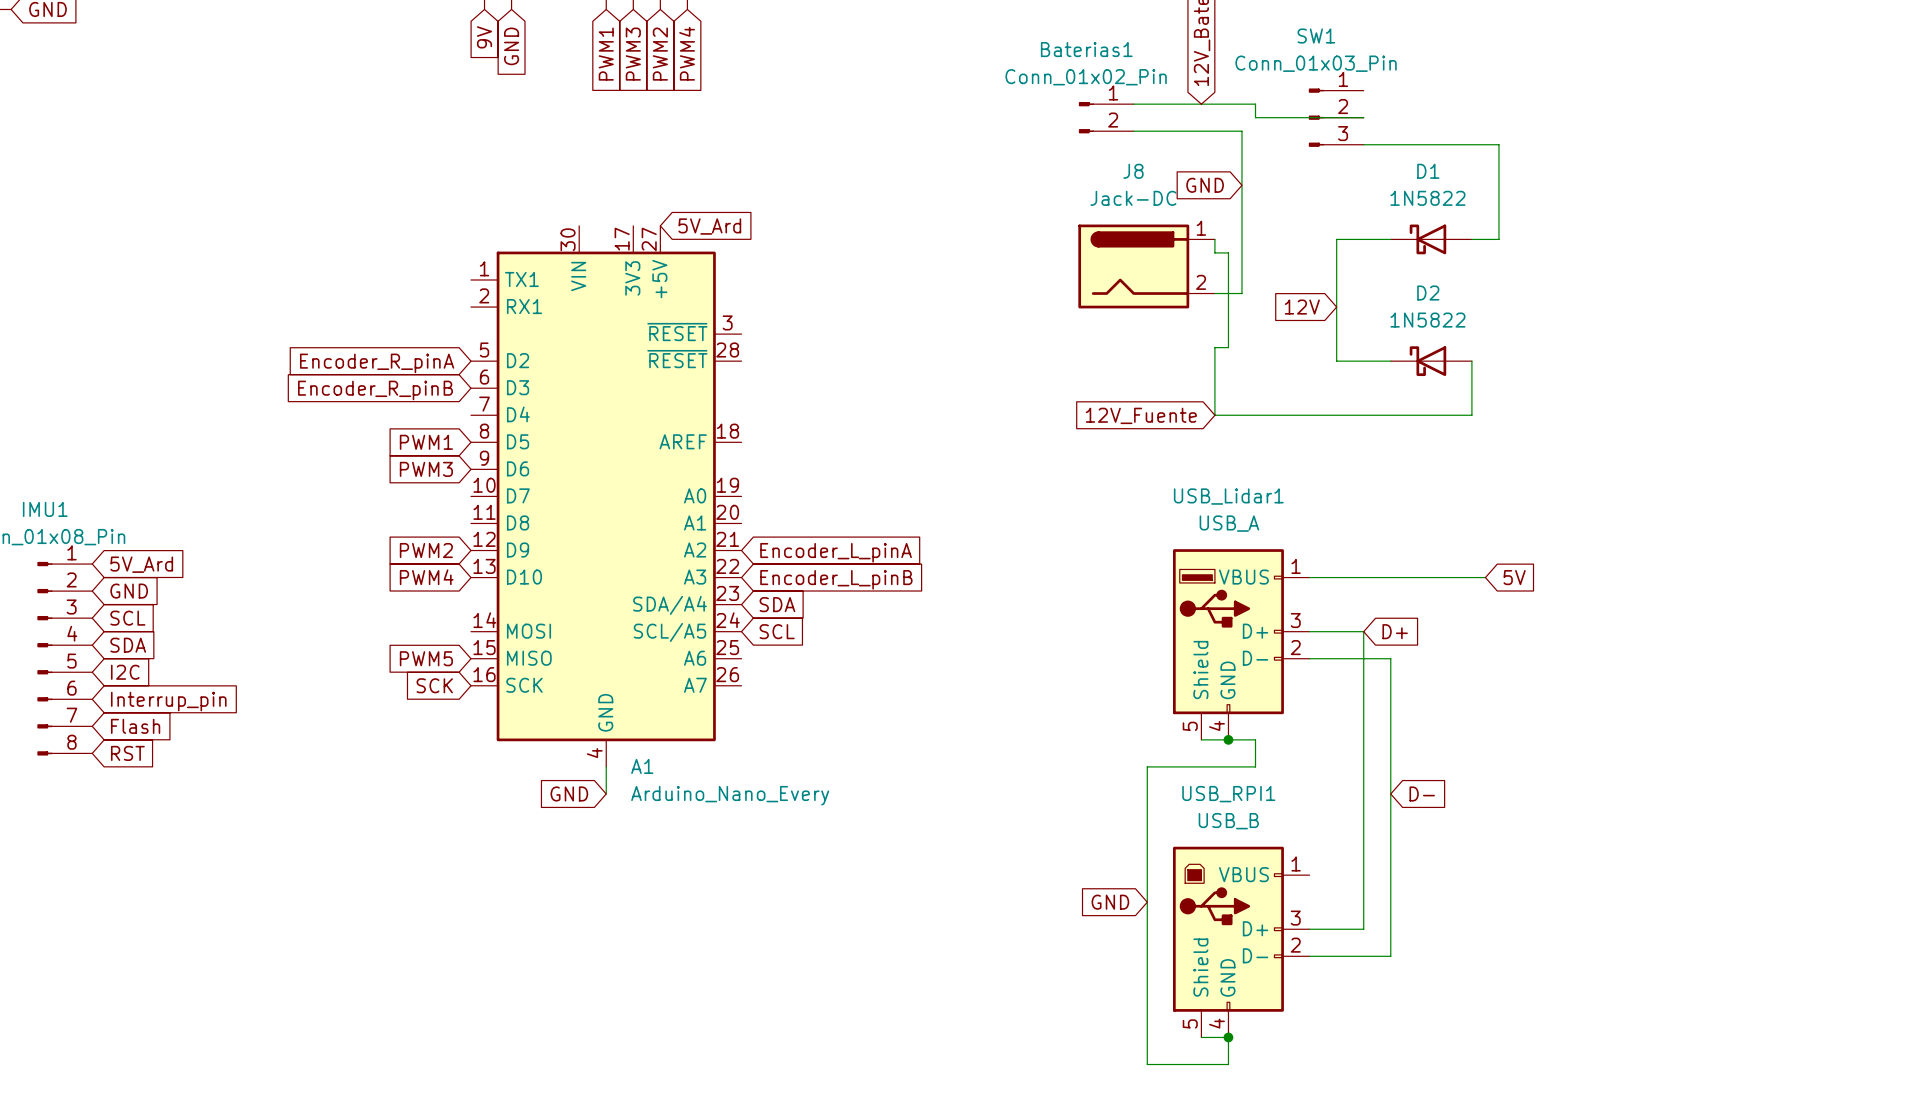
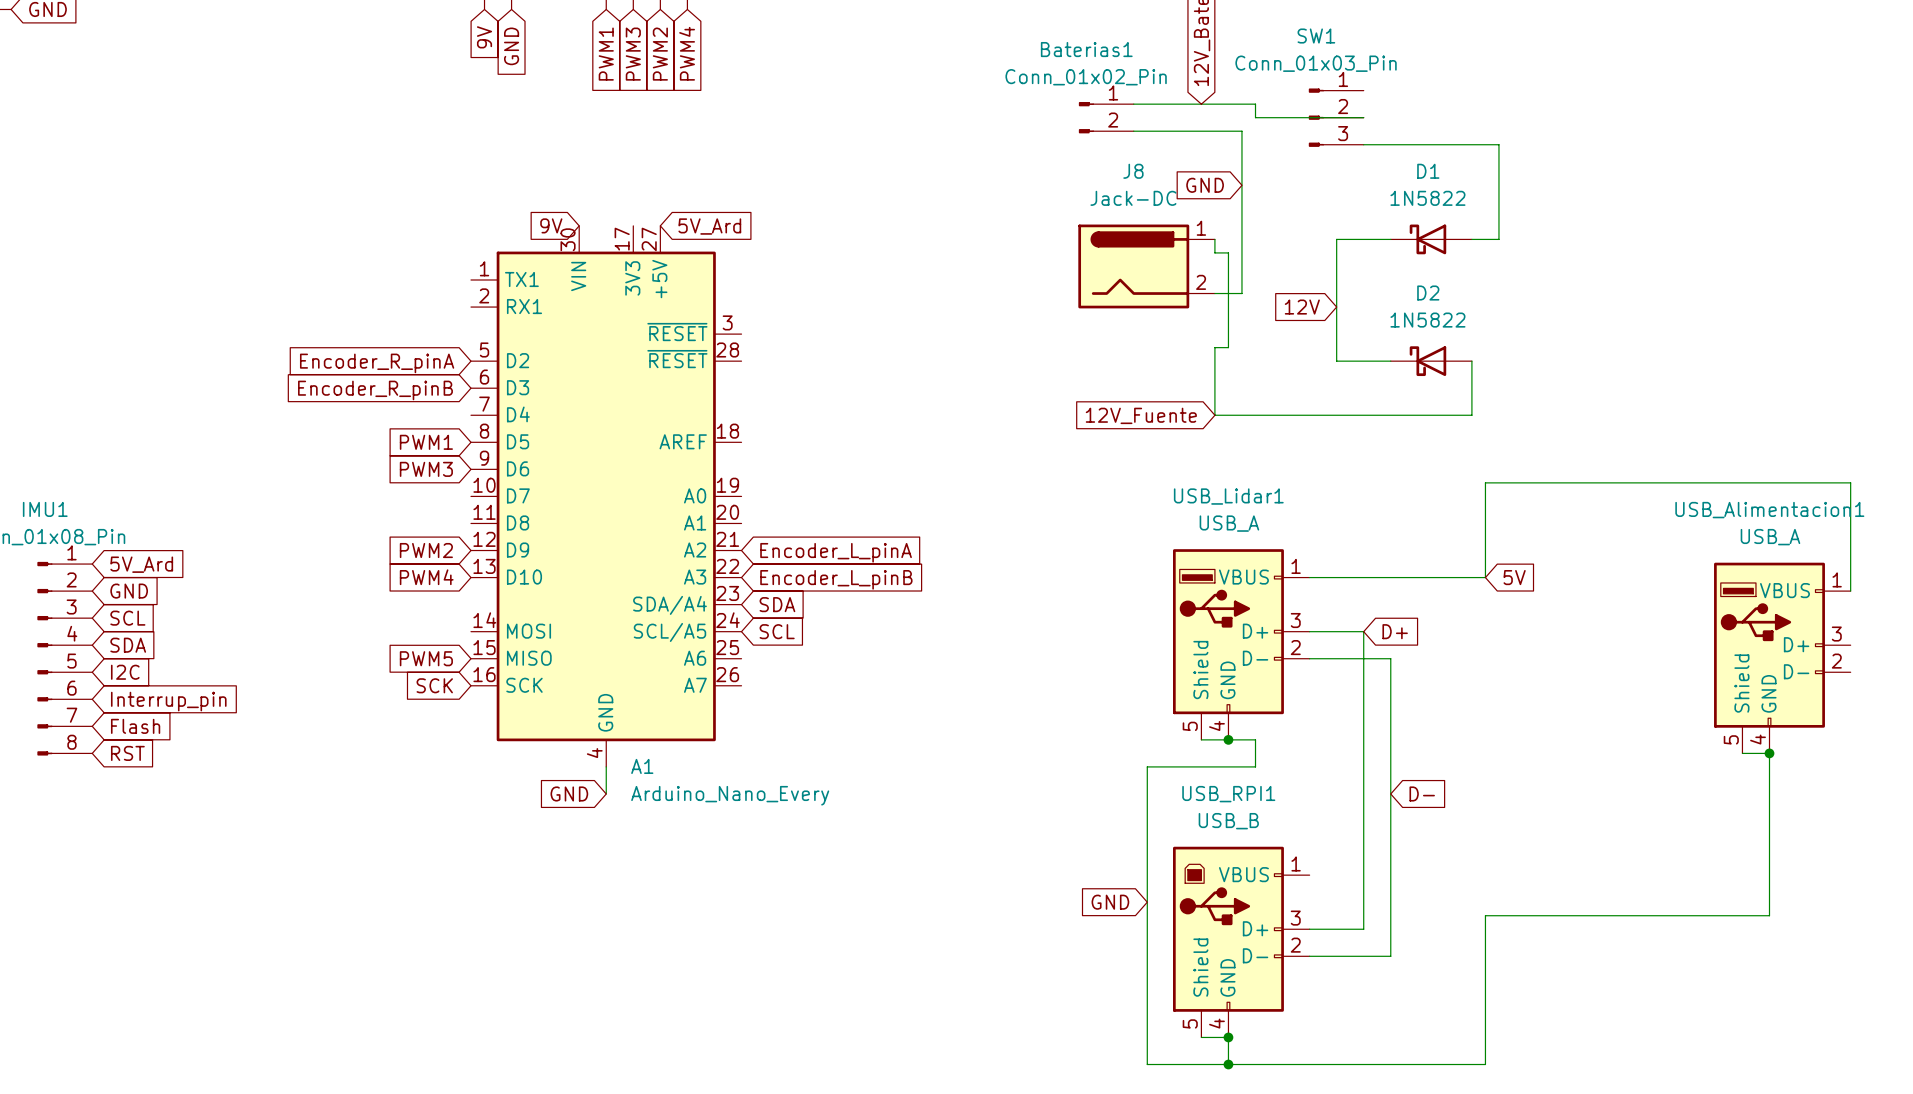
global label: none -> 9V (551, 225)
wire: none -> (1485, 577) (1485, 482) (1850, 482) (1850, 591)
USB_Alimentacion1: none -> USB_A (1782, 658)
wire: none -> (1742, 753) (1769, 753) (1769, 915) (1485, 915) (1485, 1064) (1228, 1064)
junction: none -> (1769, 753)
junction: none -> (1228, 1064)

